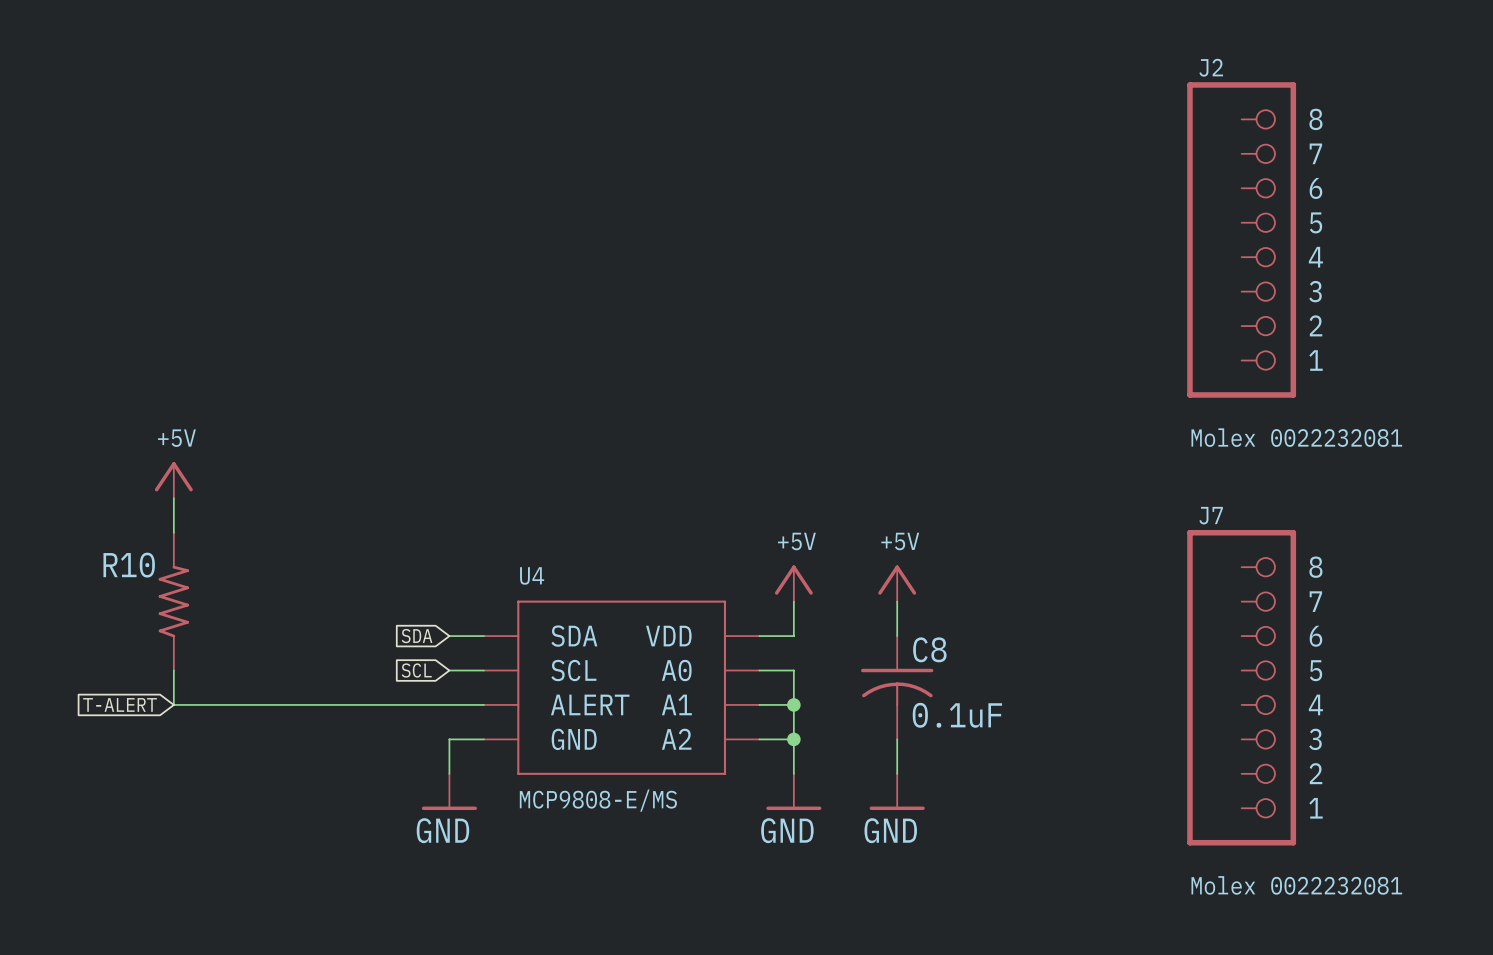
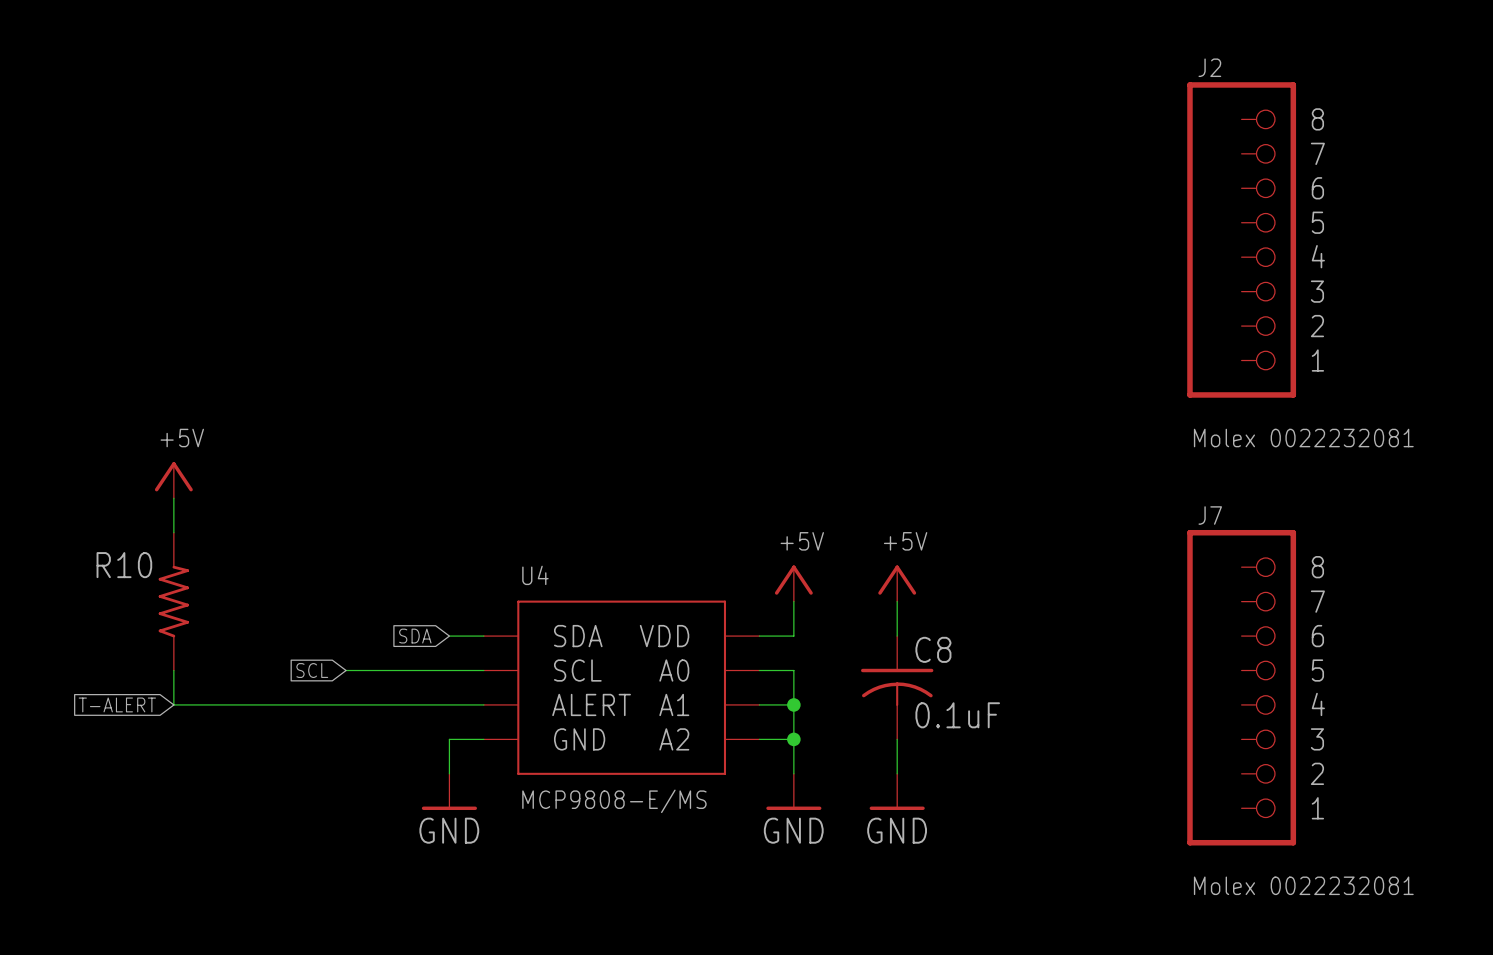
wire: none -> (346, 670) (449, 670)
global label position: SCL (416, 670) -> SCL (312, 670)

